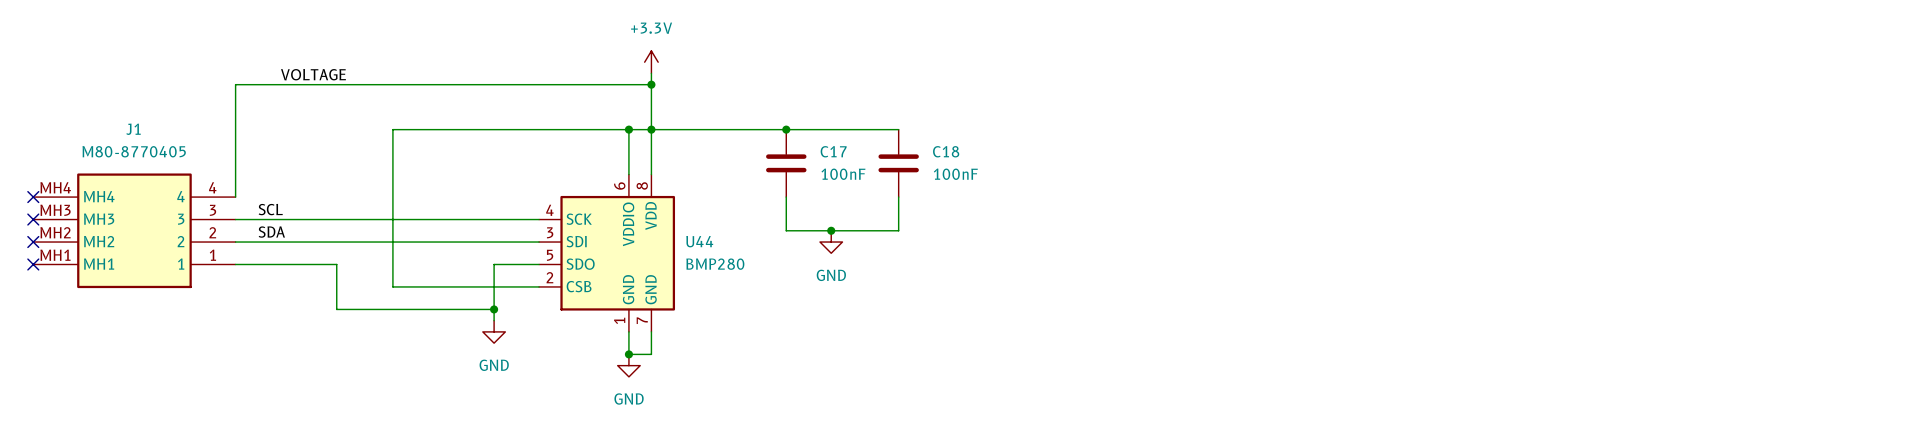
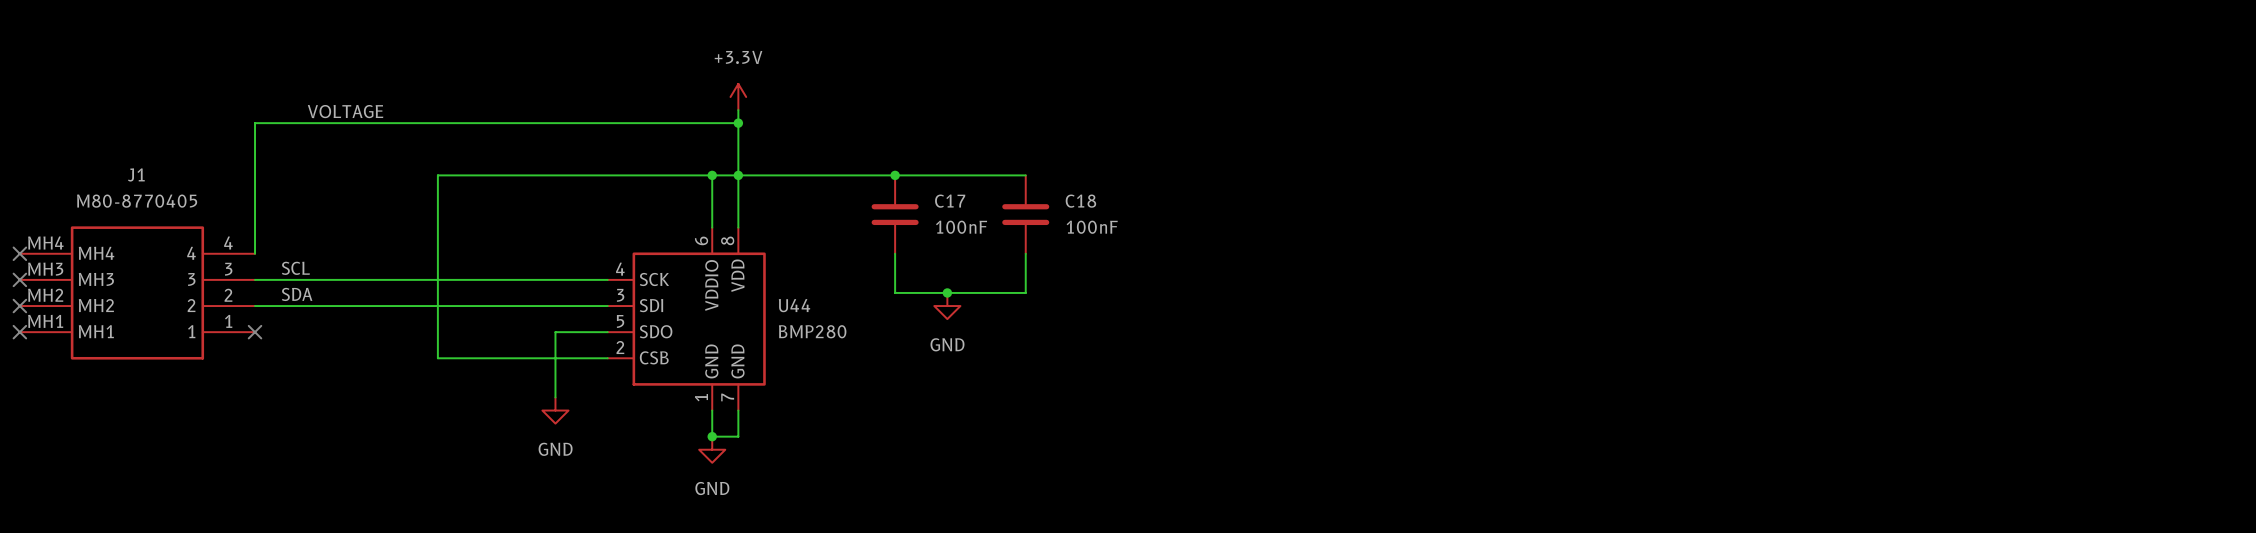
wire: (235, 264) (336, 264) (336, 309) (494, 309) -> none
no-connect mark: none -> (255, 332)
junction: (494, 309) -> none

